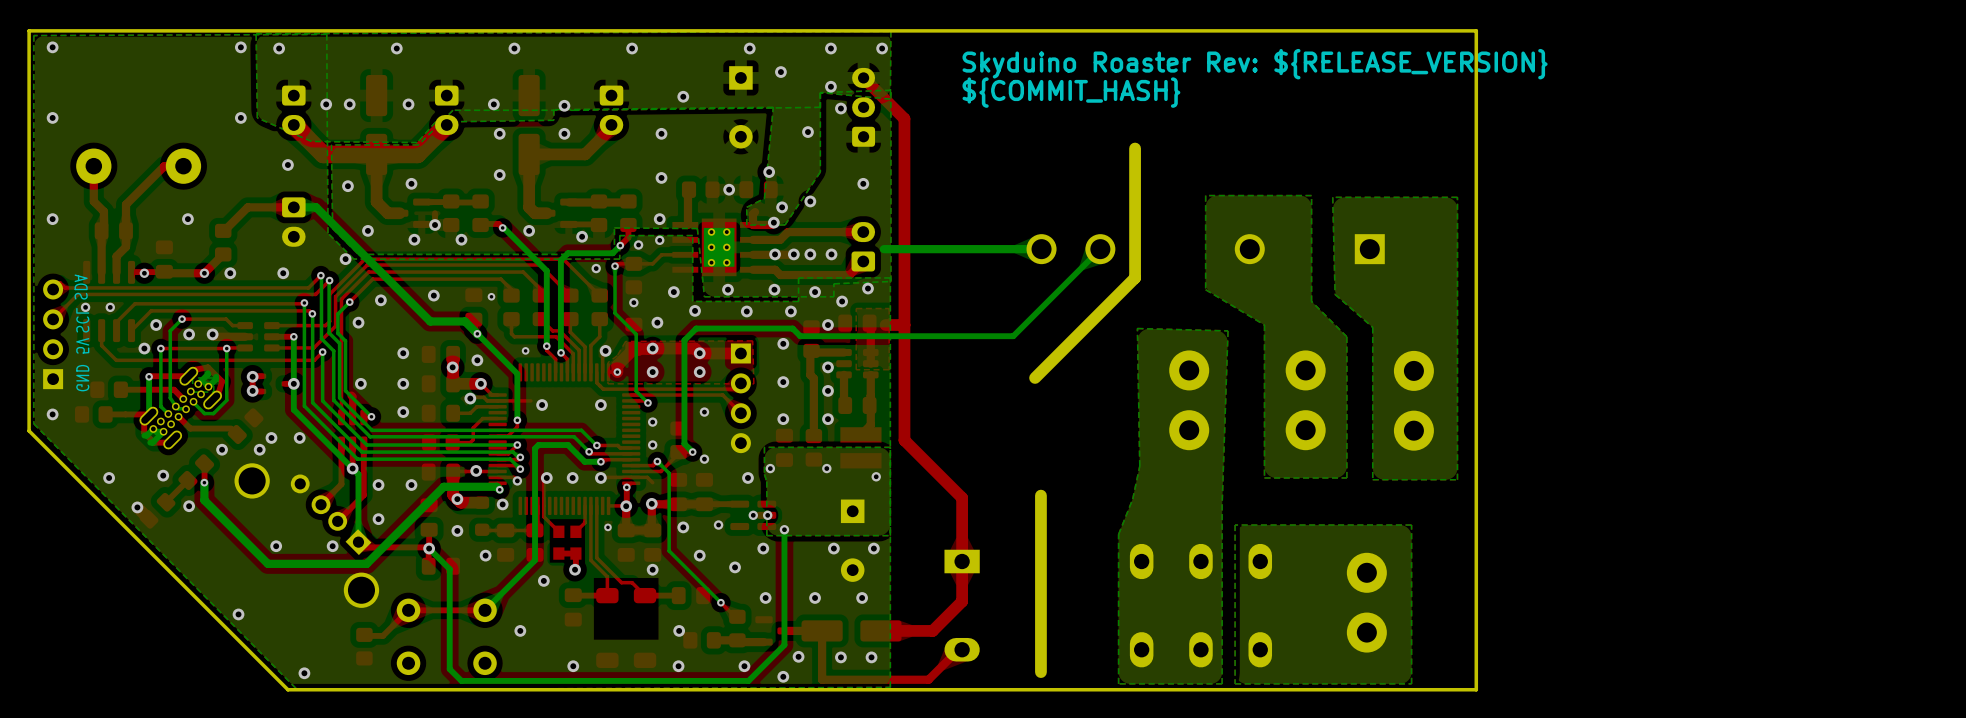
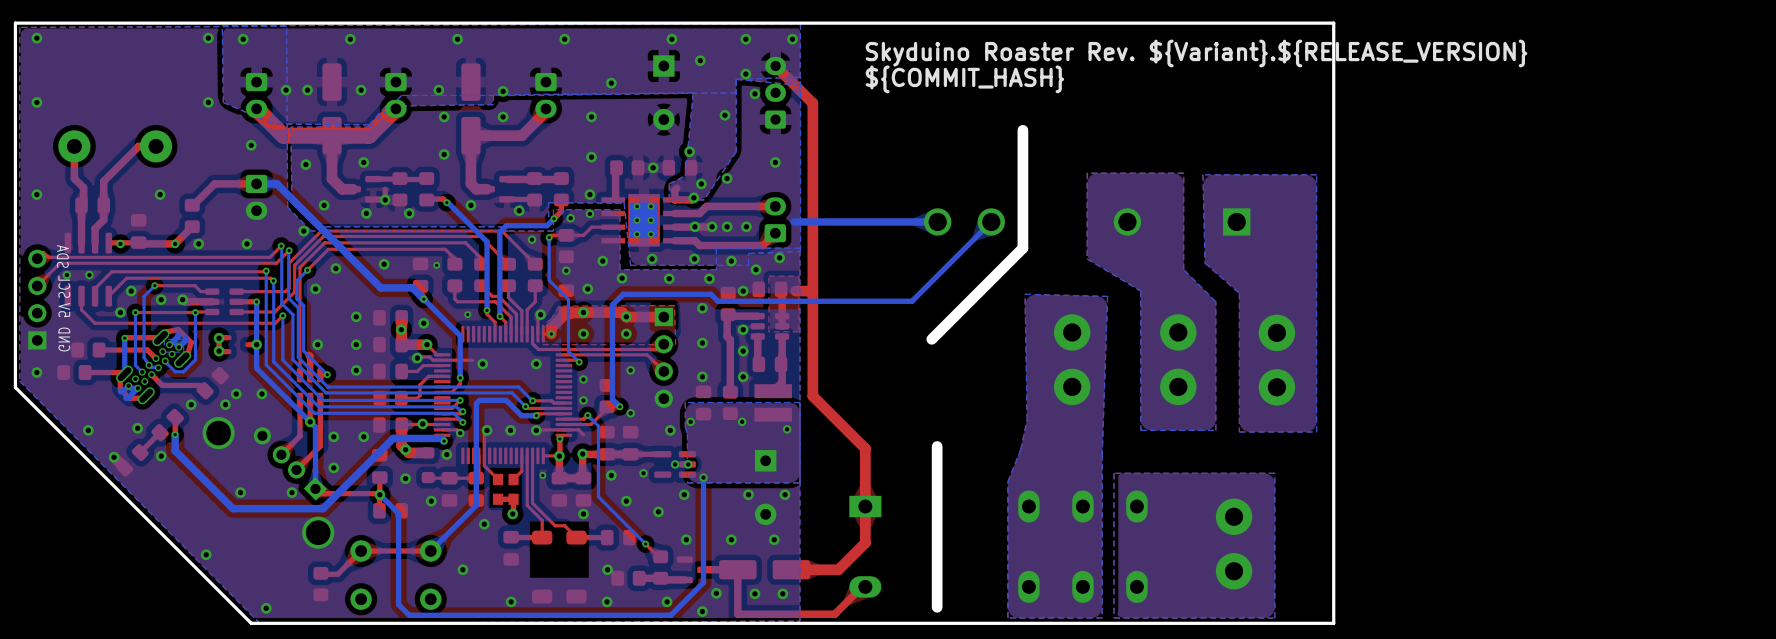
text: Skyduino Roaster Rev: ${RELEASE_VERSION} (1255, 64) -> Skyduino Roaster Rev. ${Variant}.${RELEASE_VERSION} (1196, 53)

